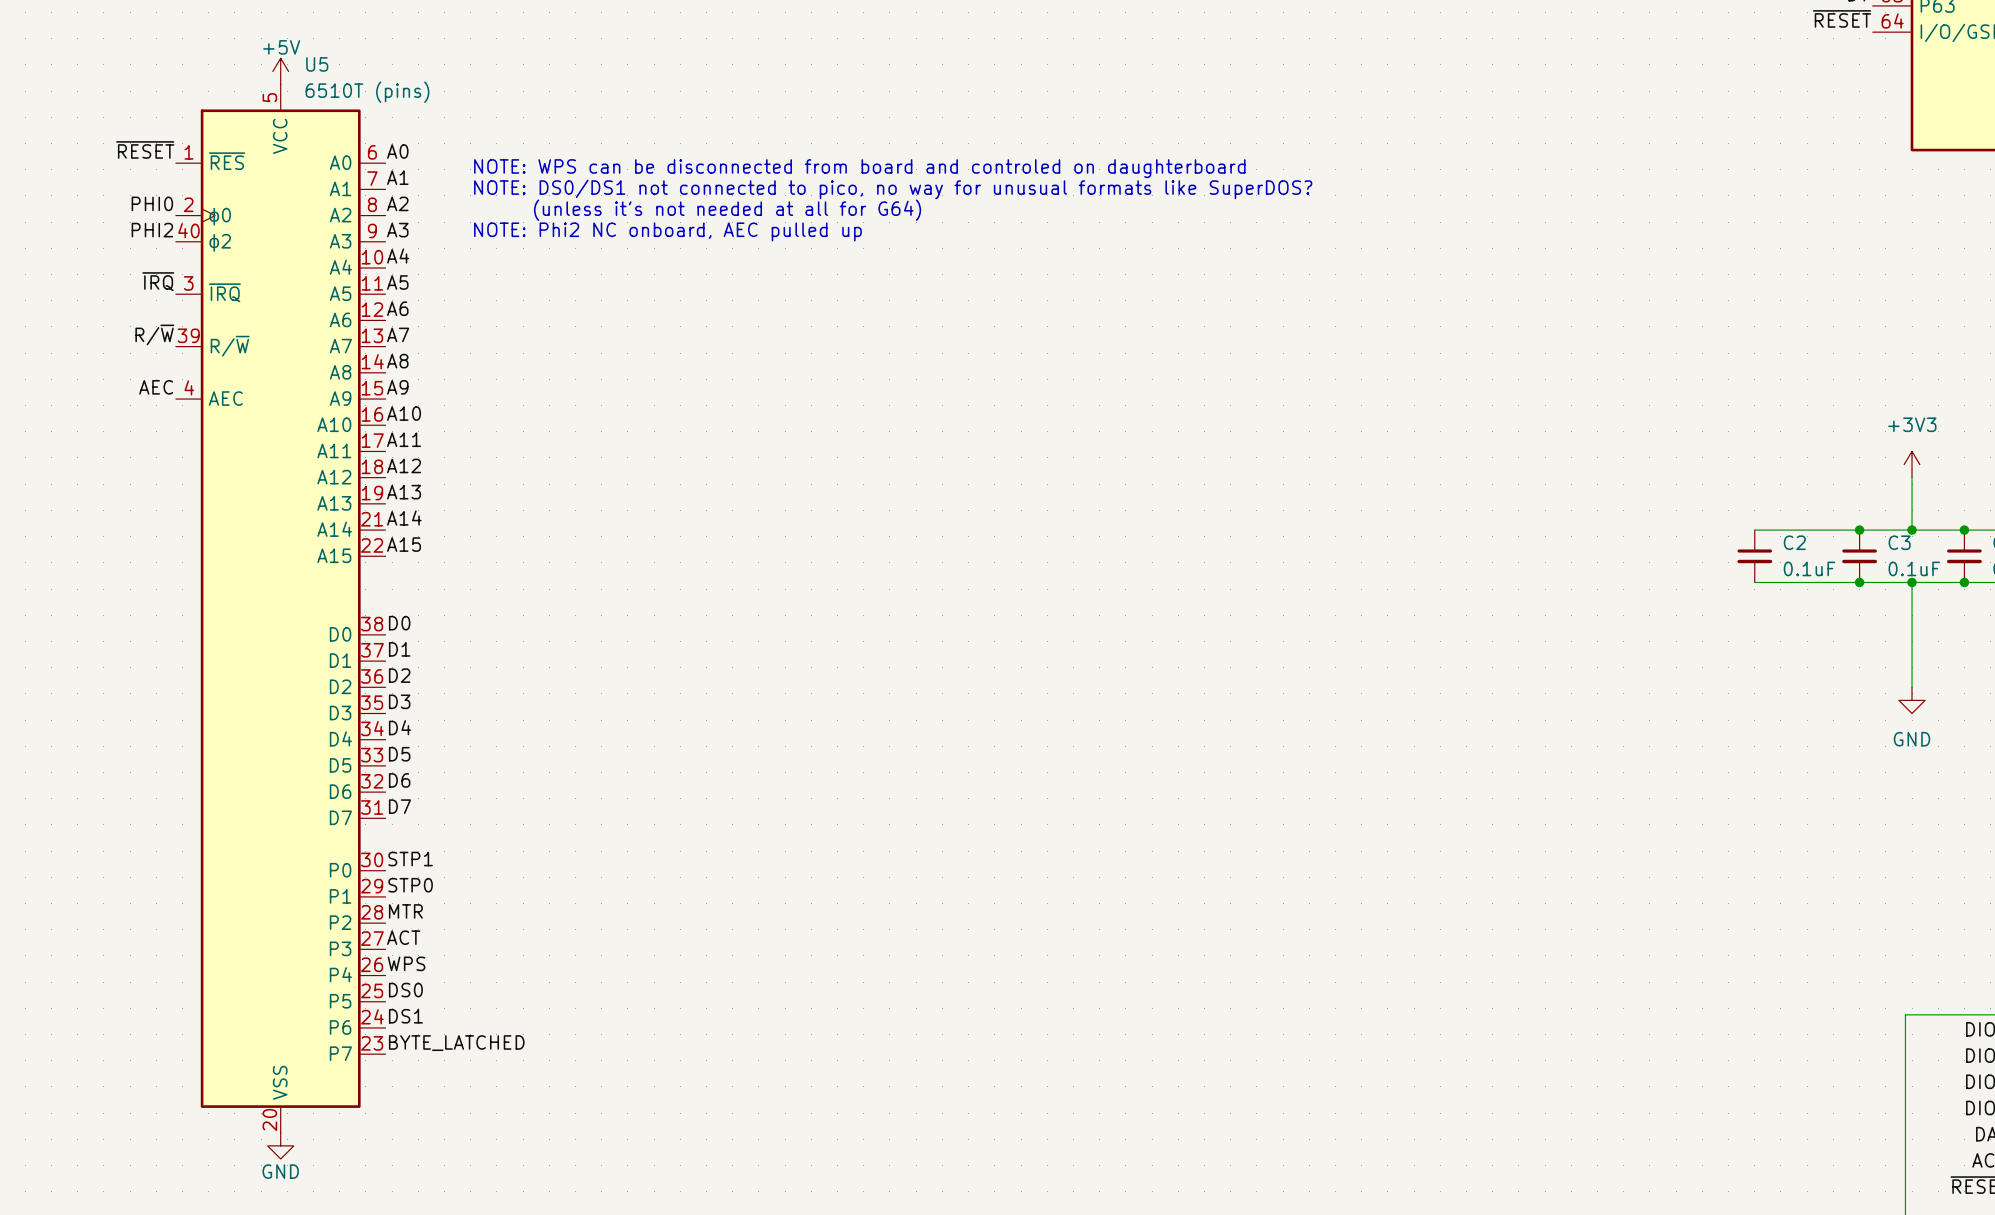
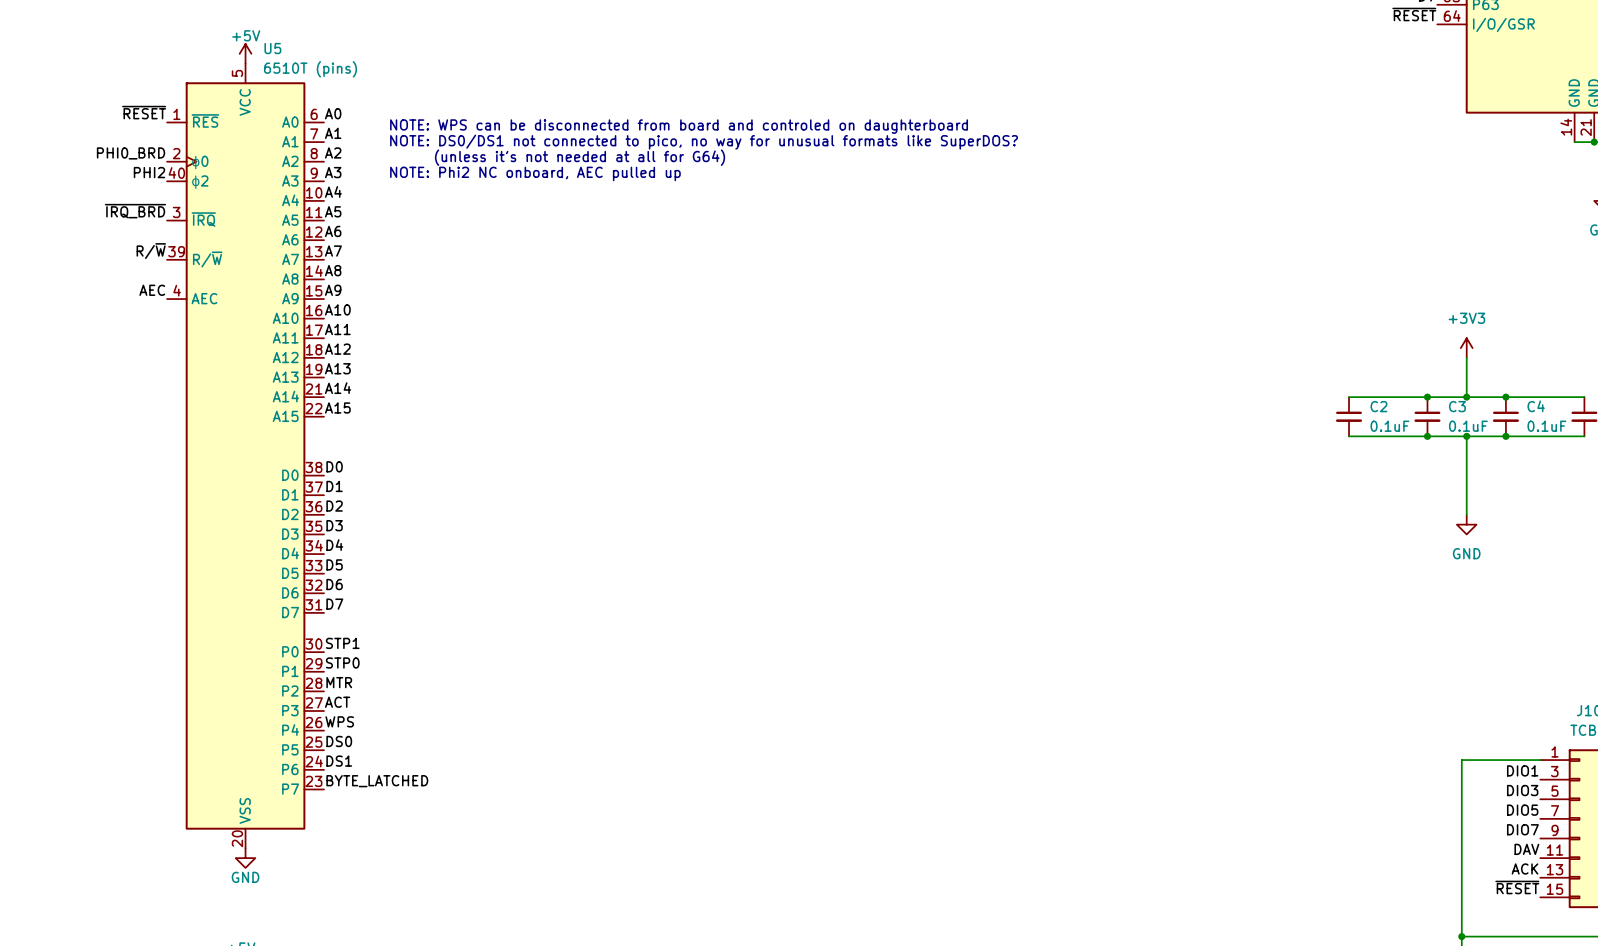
label: PHI0 (152, 203) -> PHI0_BRD (131, 153)
label: ~{IRQ} (158, 281) -> ~{IRQ_BRD} (135, 211)

